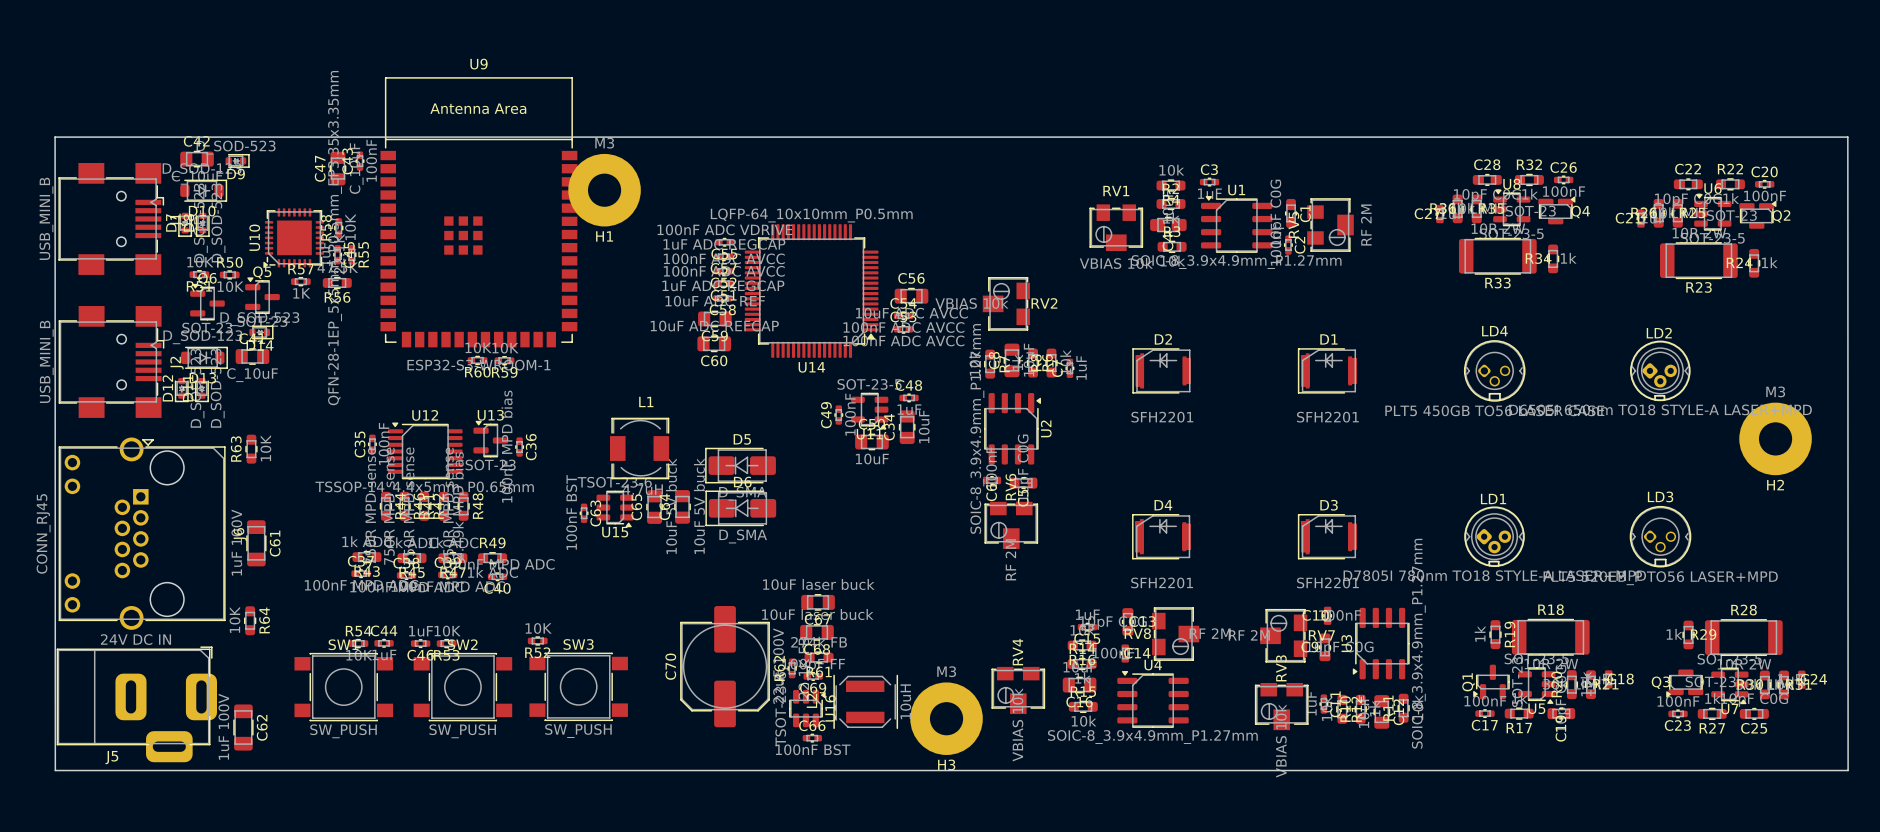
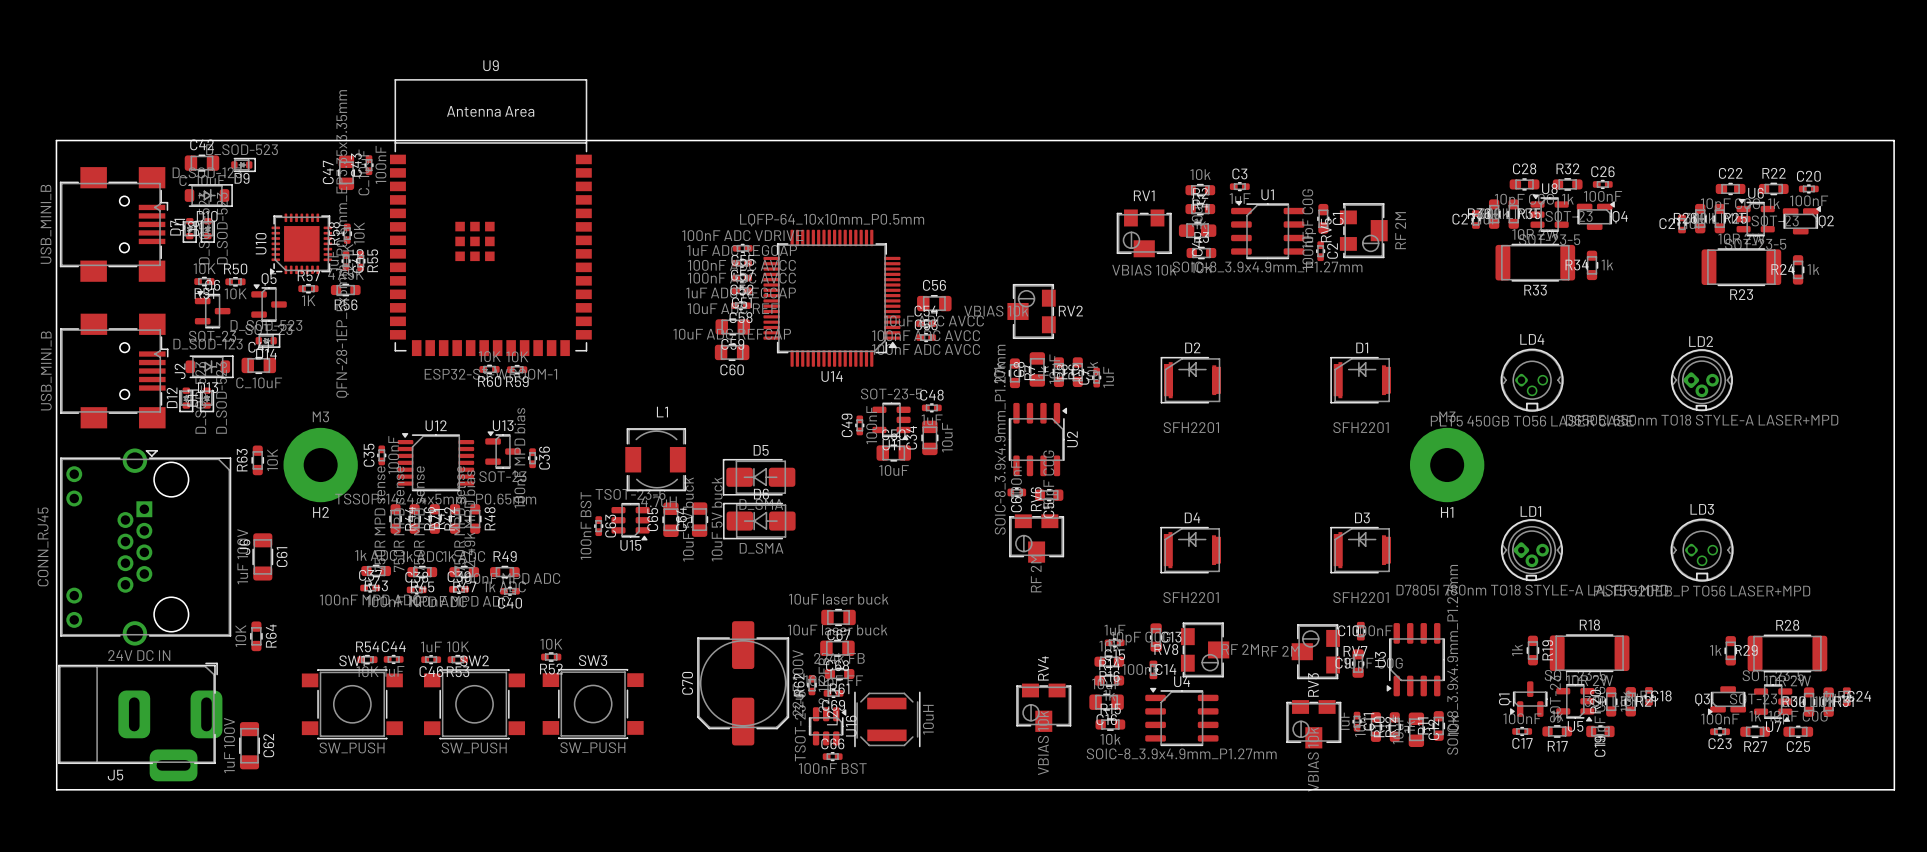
H1 position: (604, 190) -> (1447, 465)
H2 position: (1775, 438) -> (320, 465)
H3: M3 (946, 718) -> none

